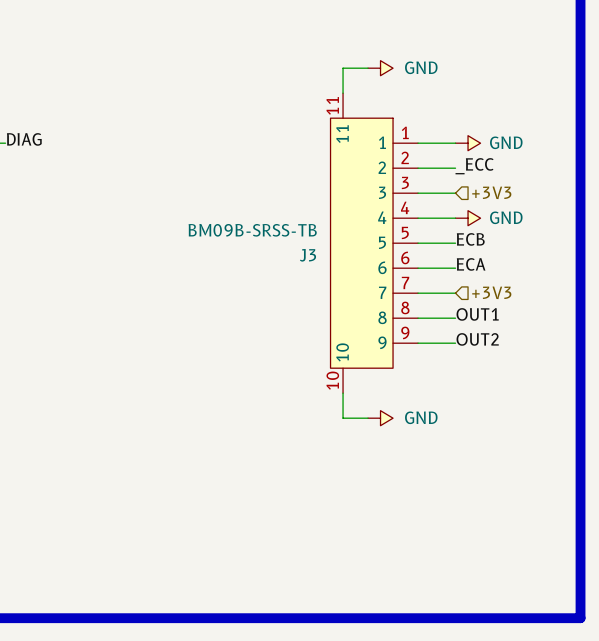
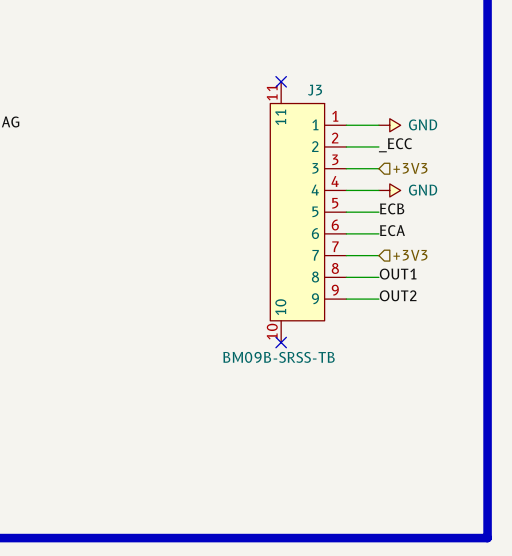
wire: (368, 68) (343, 68) (343, 93) -> none
power symbol: GND (380, 68) -> none
no-connect mark: none -> (281, 81)
J3 value position: BM09B-SRSS-TB (252, 230) -> BM09B-SRSS-TB (278, 357)
J3 name position: J3 (307, 255) -> J3 (315, 90)
wire: (343, 393) (343, 418) (368, 418) -> none
no-connect mark: none -> (281, 342)
power symbol: GND (380, 418) -> none

